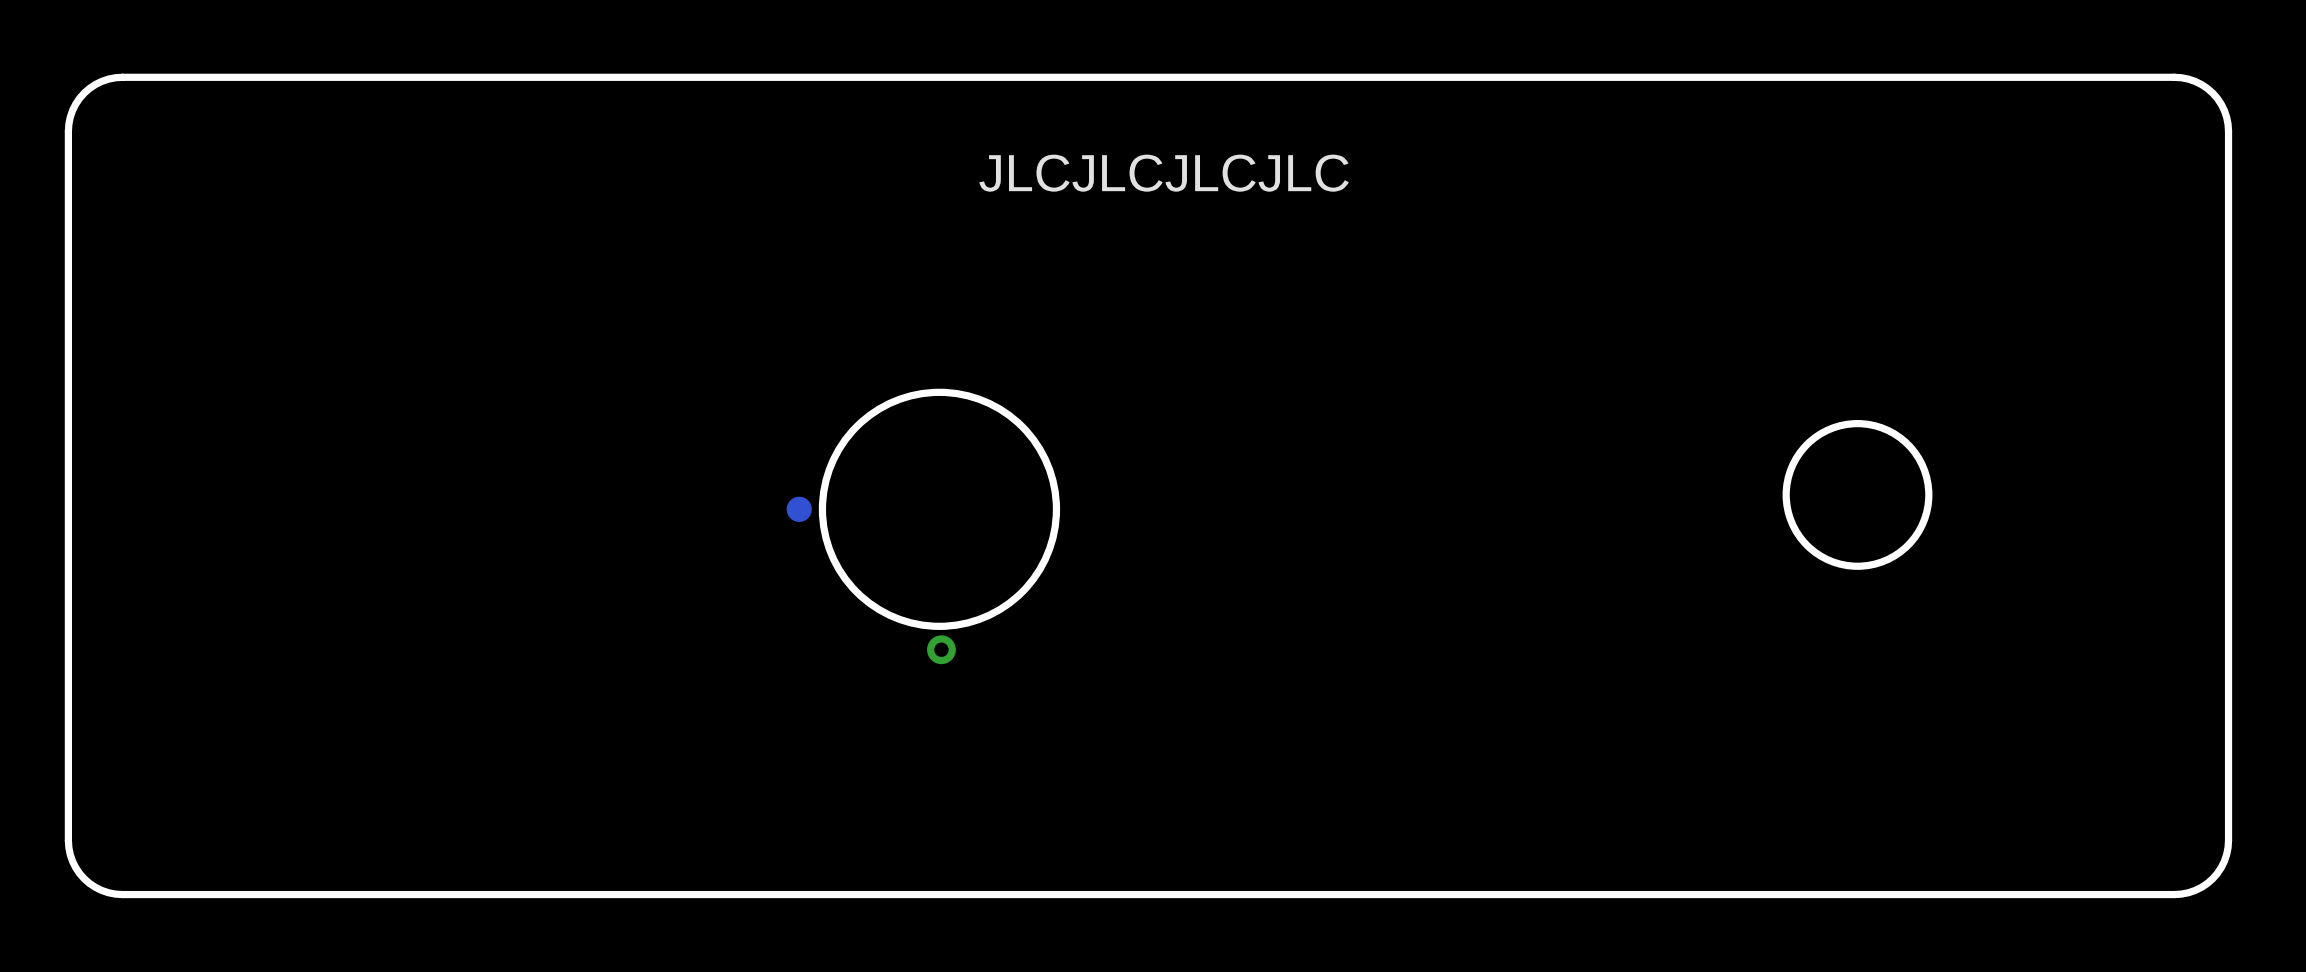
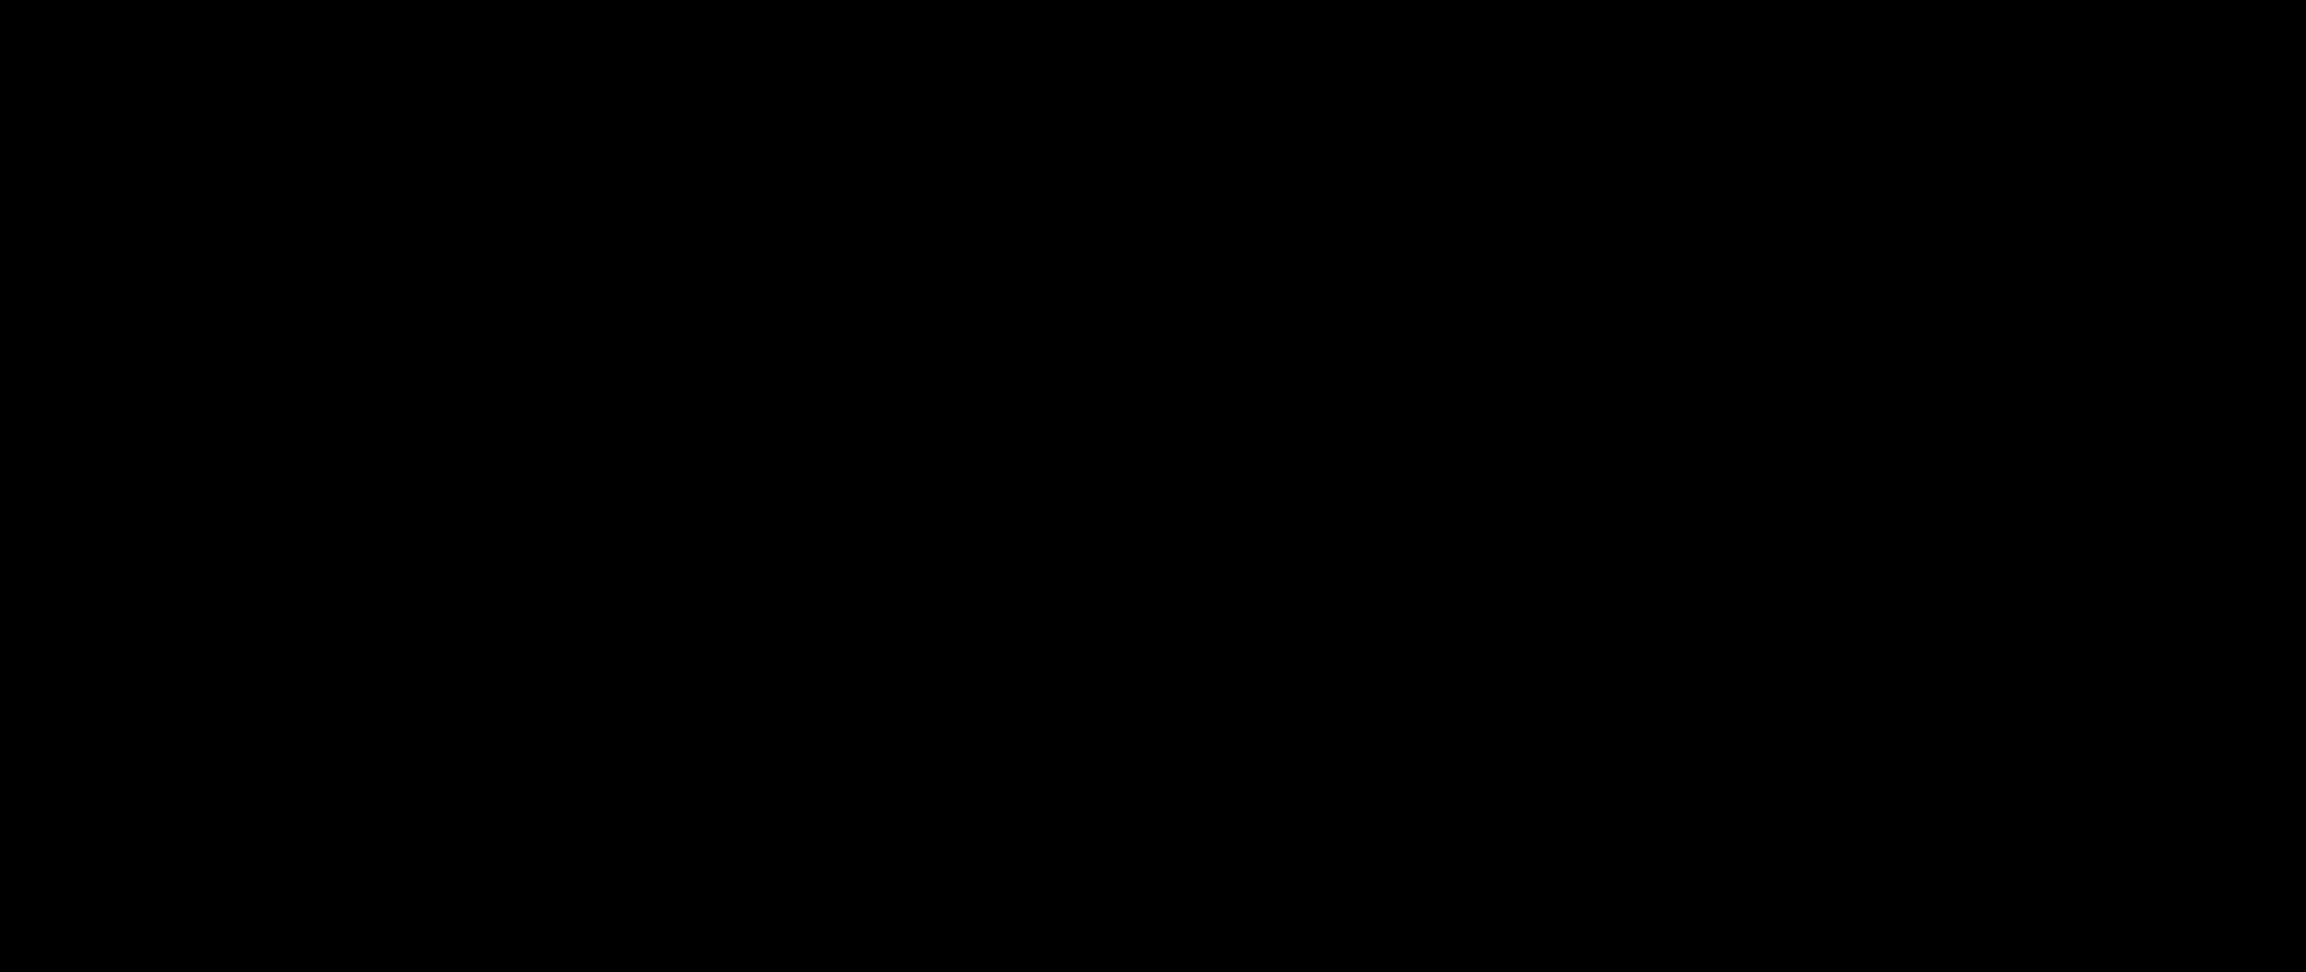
board edge: (2174, 77) (122, 77) (101, 81) (89, 88) (79, 98) (72, 110) (68, 131) (68, 840) (72, 861) (84, 878) (95, 887) (108, 892) (122, 894) (2174, 894) (2195, 890) (2212, 878) (2221, 867) (2226, 854) (2228, 840) (2228, 131) (2224, 110) (2212, 93) (2195, 81) (2174, 77) -> none
text: JLCJLCJLCJLC (1164, 173) -> none
round board edge: [818, 388, 1061, 630] -> none
round board edge: [1782, 420, 1933, 570] -> none
drawing: [786, 496, 812, 522] -> none
via: (941, 649) -> none

